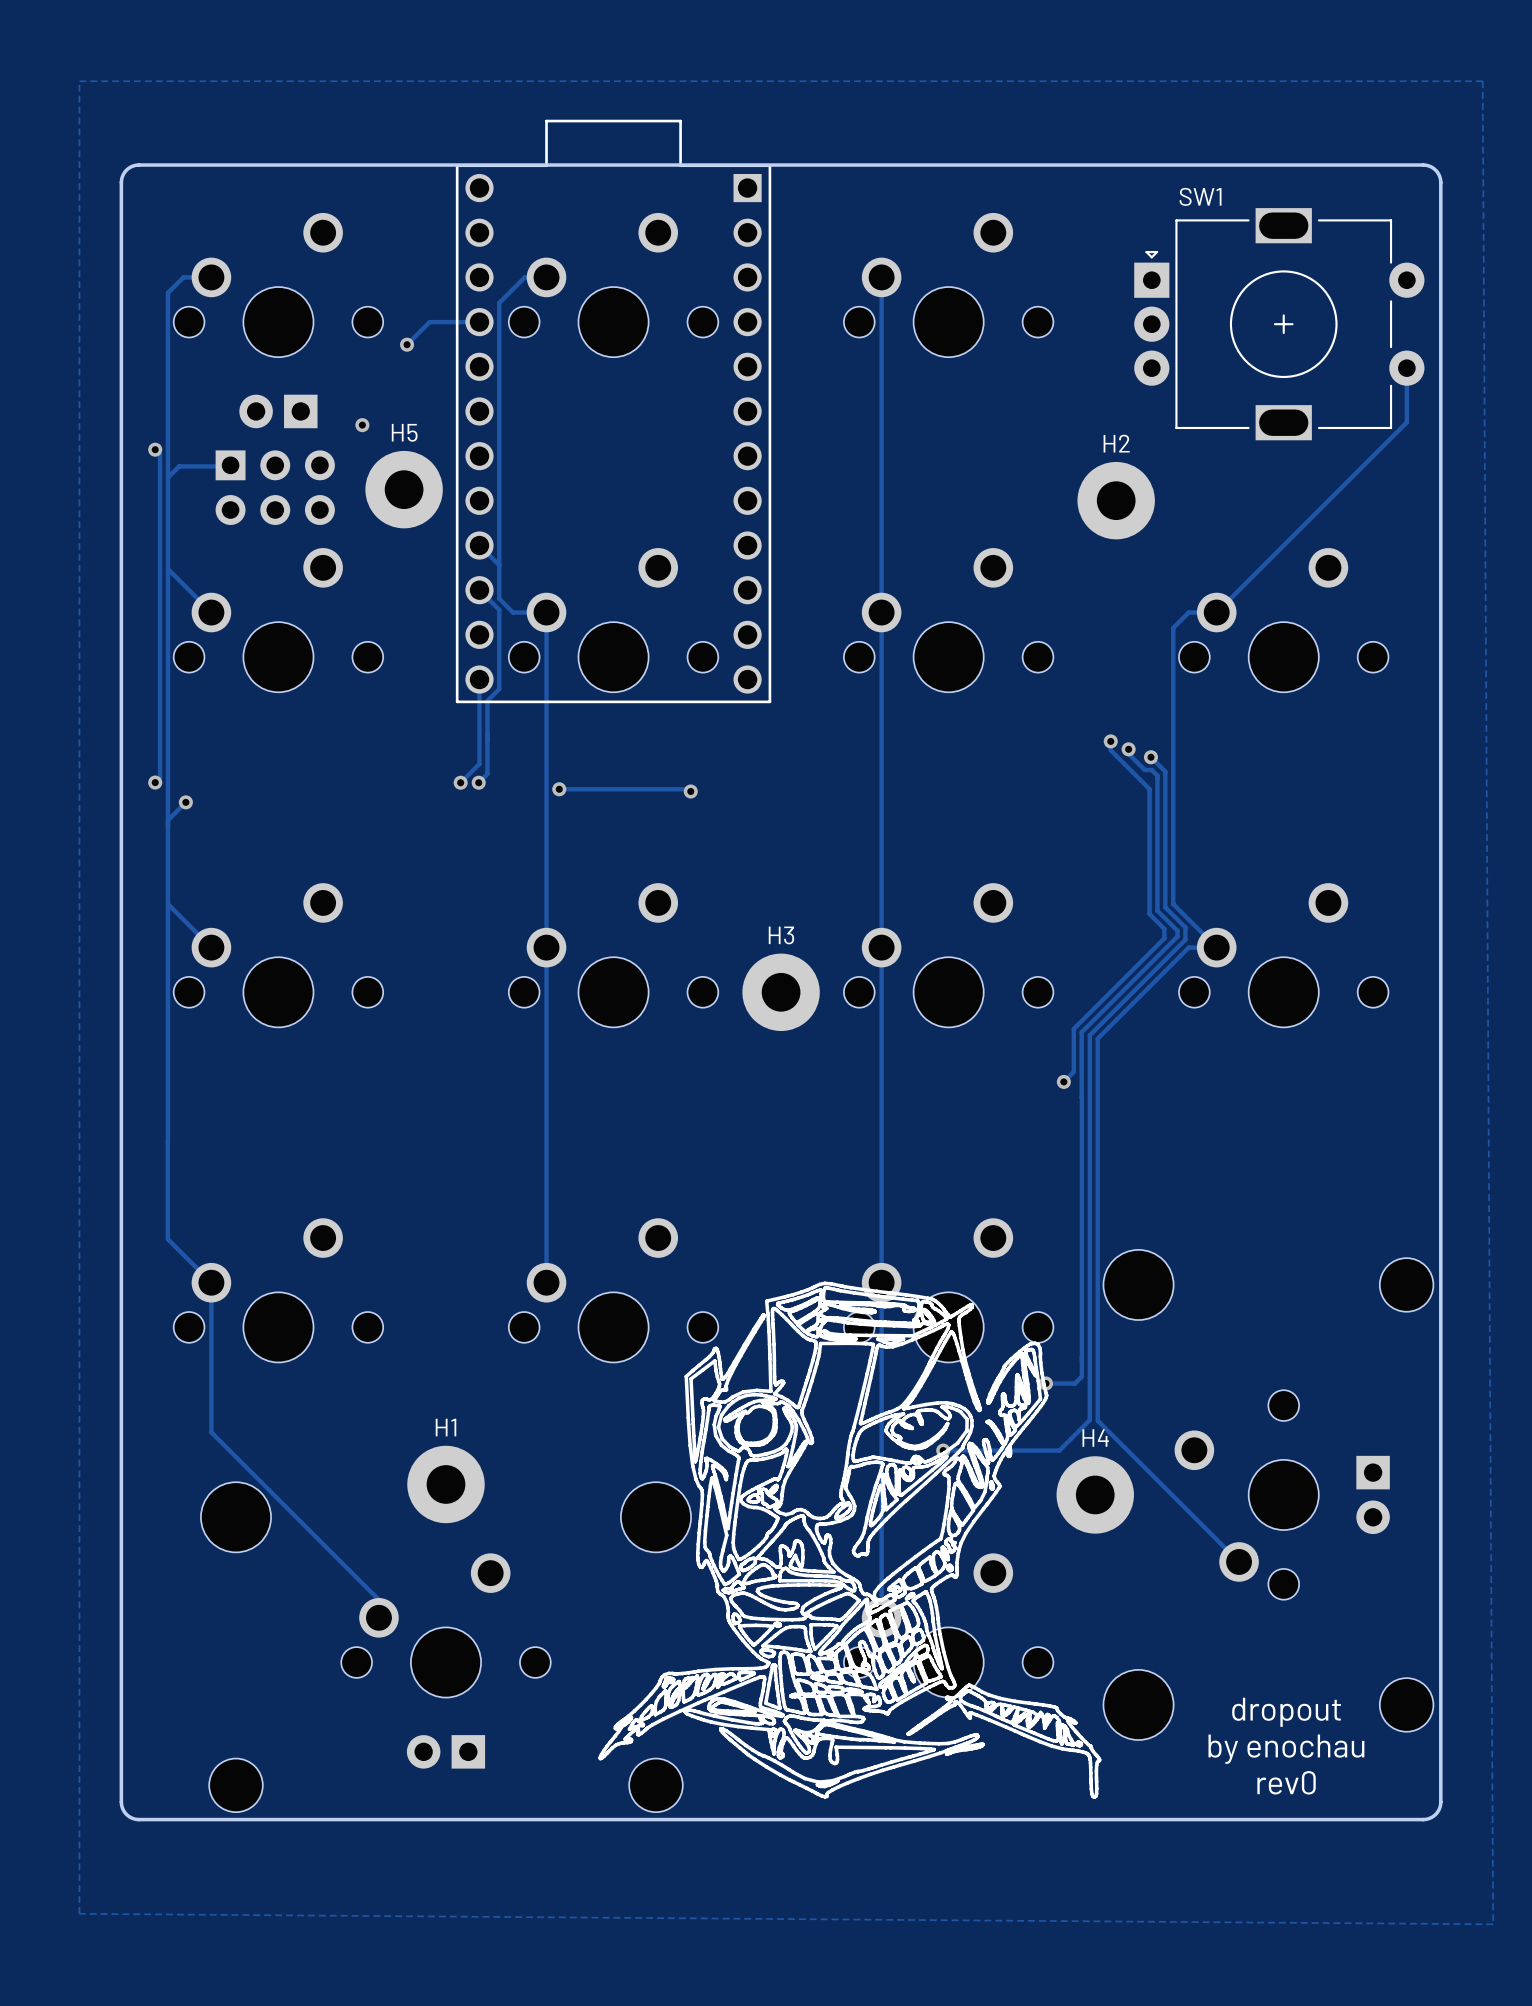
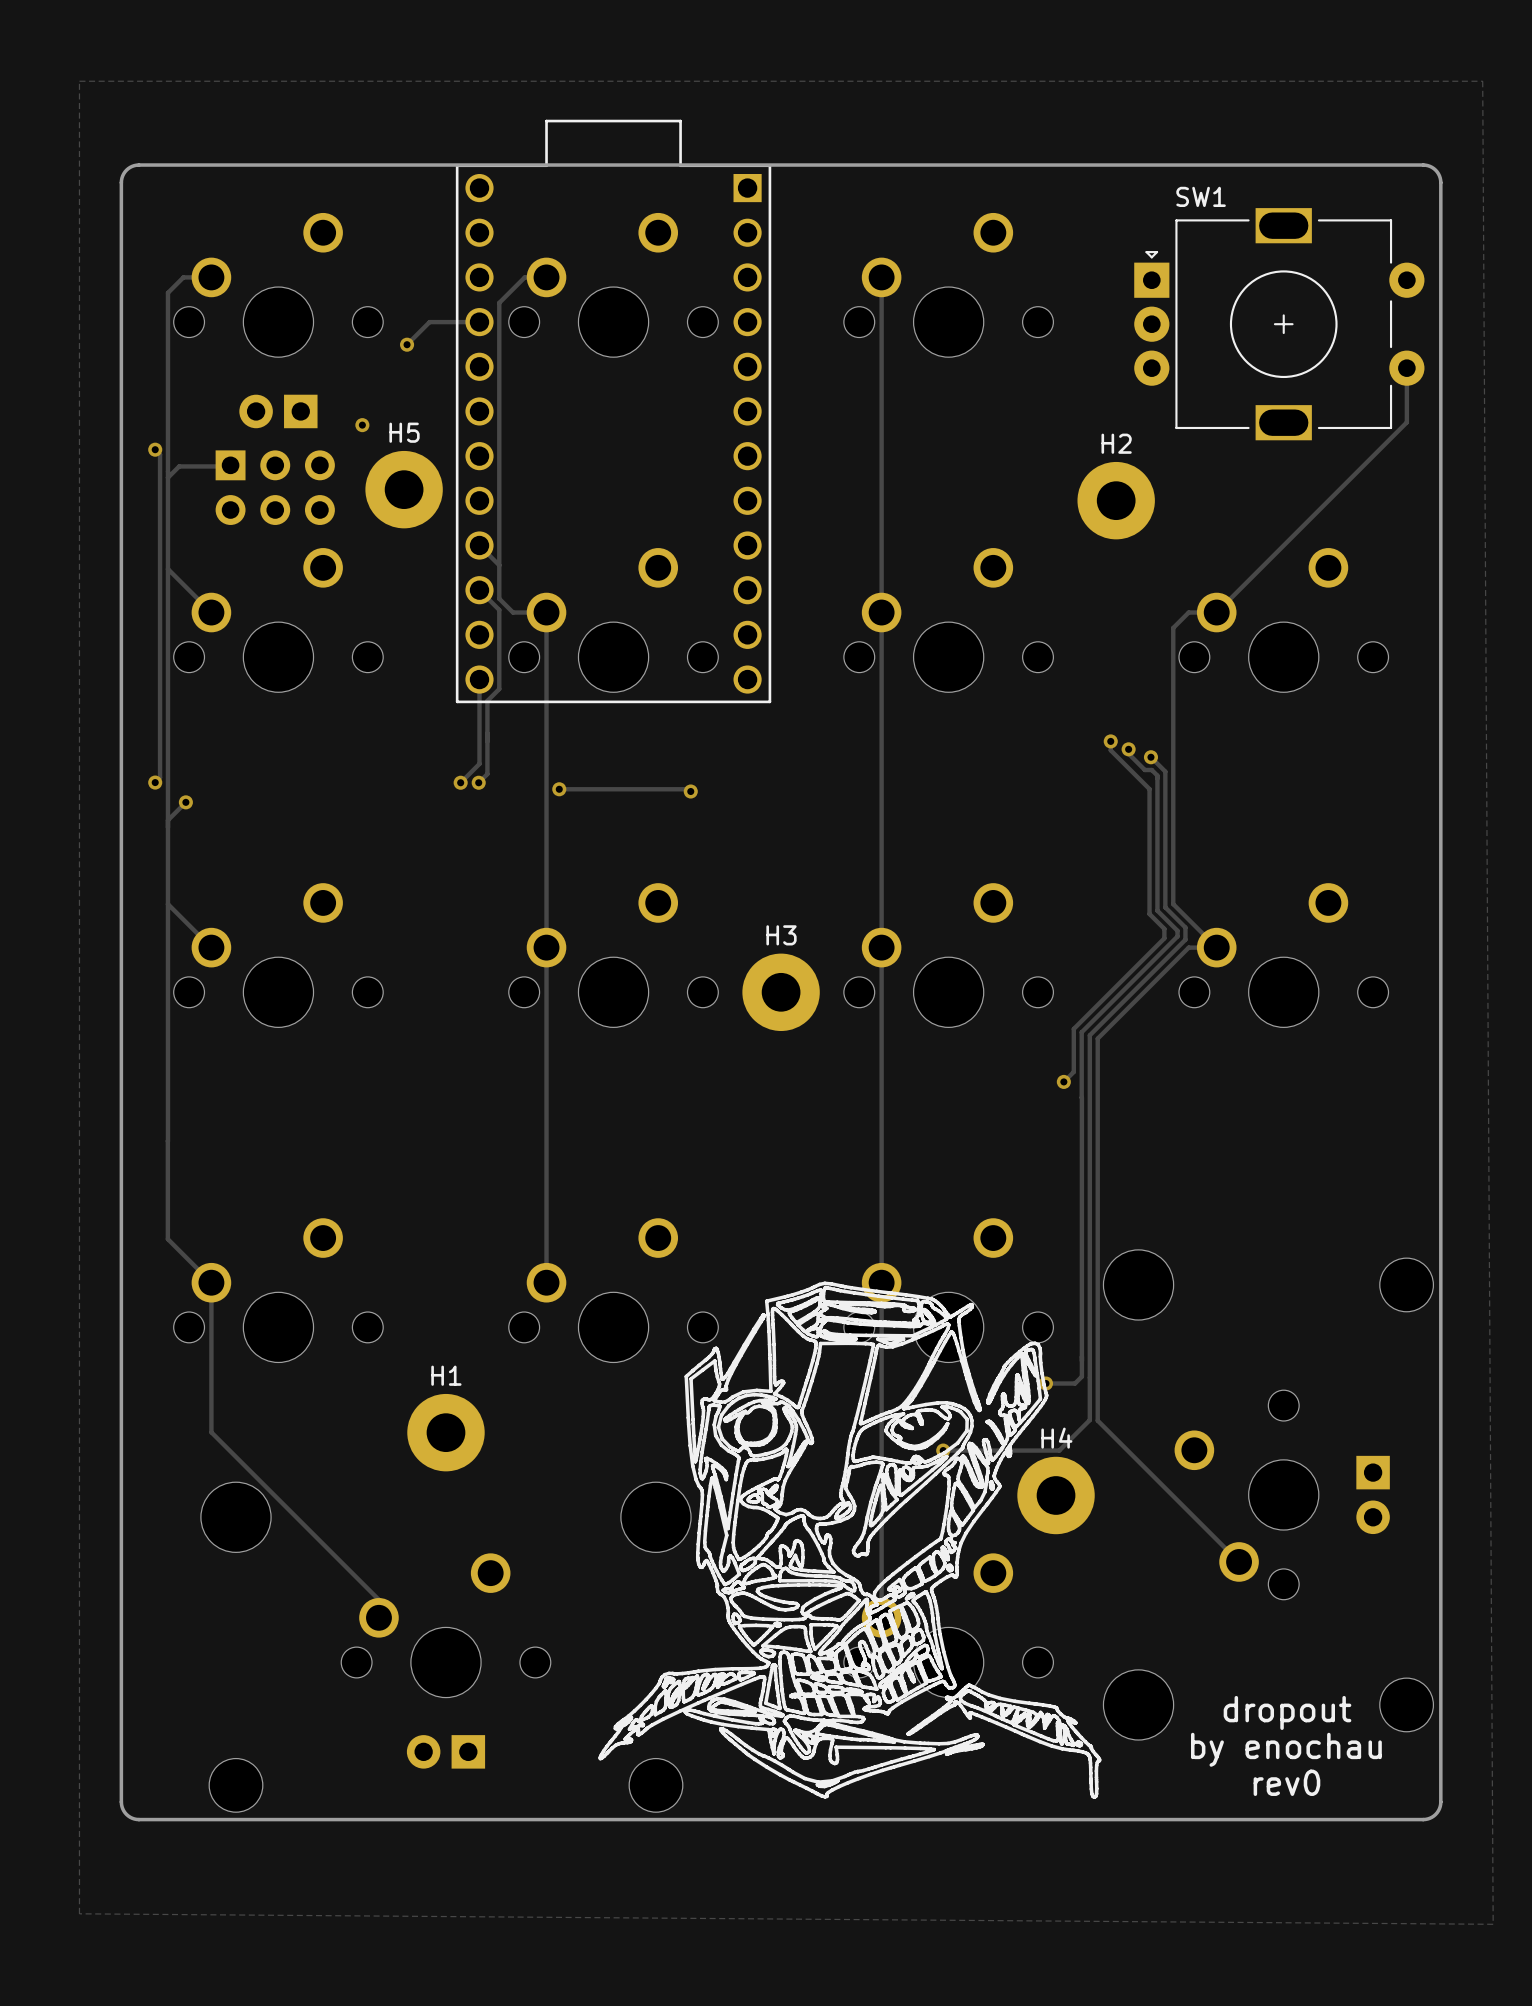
H1 position: (445, 1484) -> (445, 1432)
H4 position: (1095, 1494) -> (1056, 1495)

